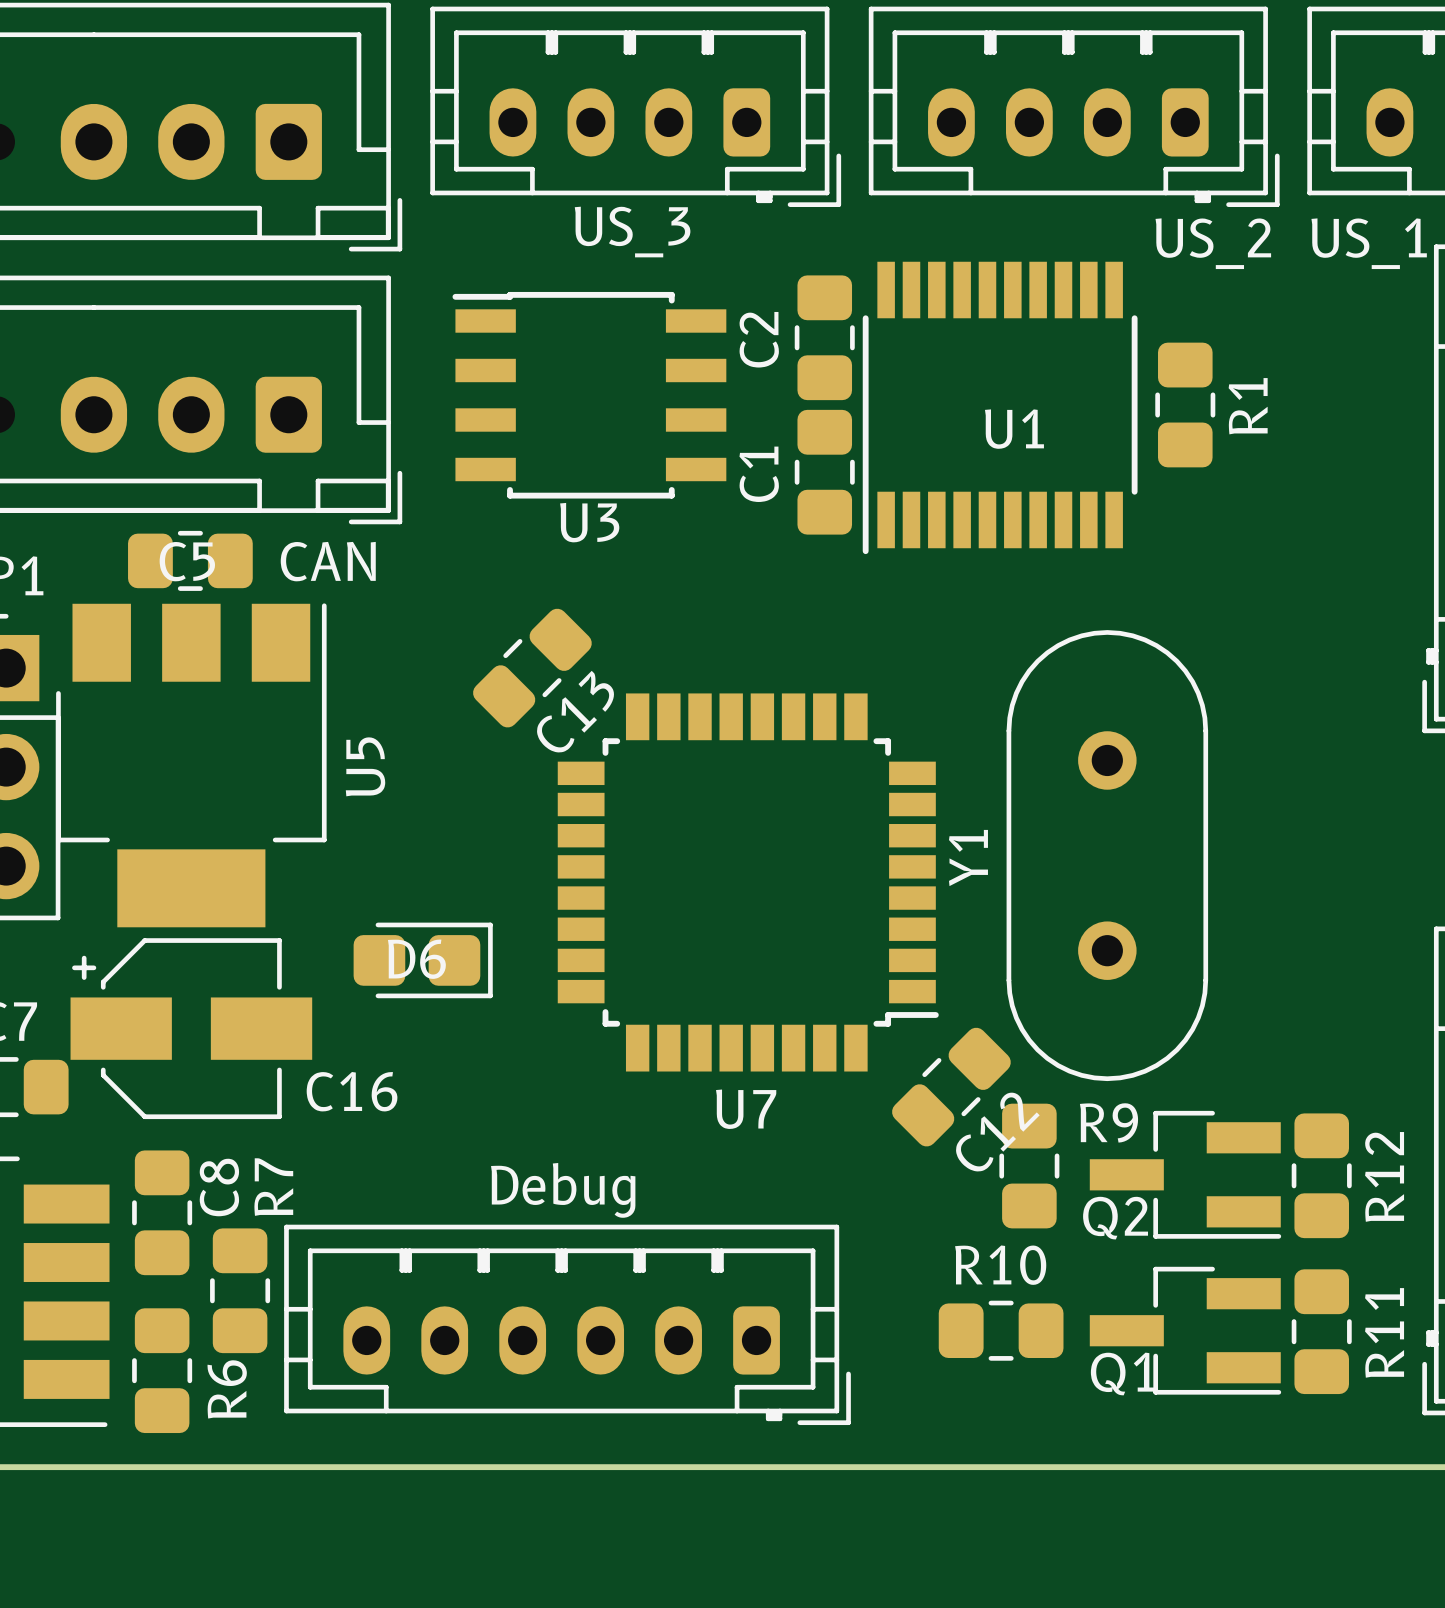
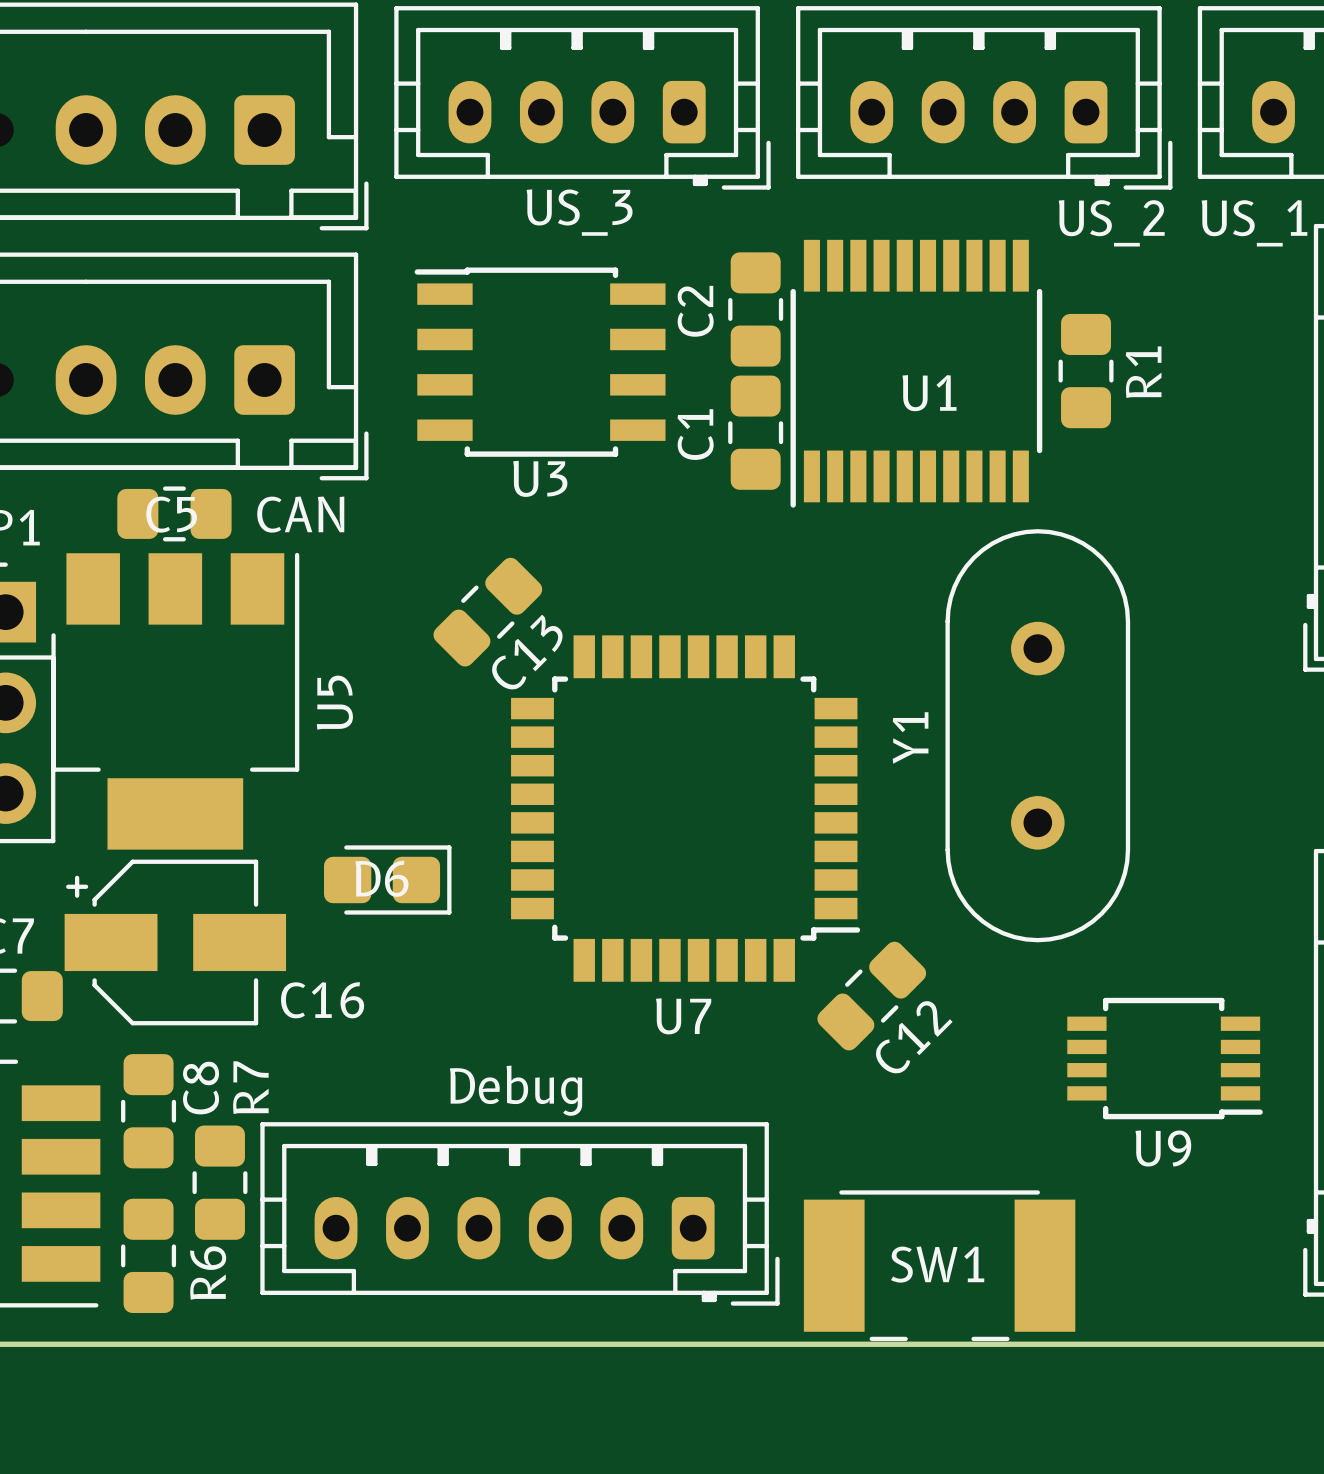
Y1 position: (1107, 855) -> (1037, 735)
U9: none -> (1165, 1058)
R9: (1029, 1166) -> none
Q2: (1185, 1174) -> none
R12: (1321, 1175) -> none
R10: (1001, 1330) -> none
Q1: (1185, 1330) -> none
R11: (1321, 1331) -> none
SW1: none -> (939, 1265)

